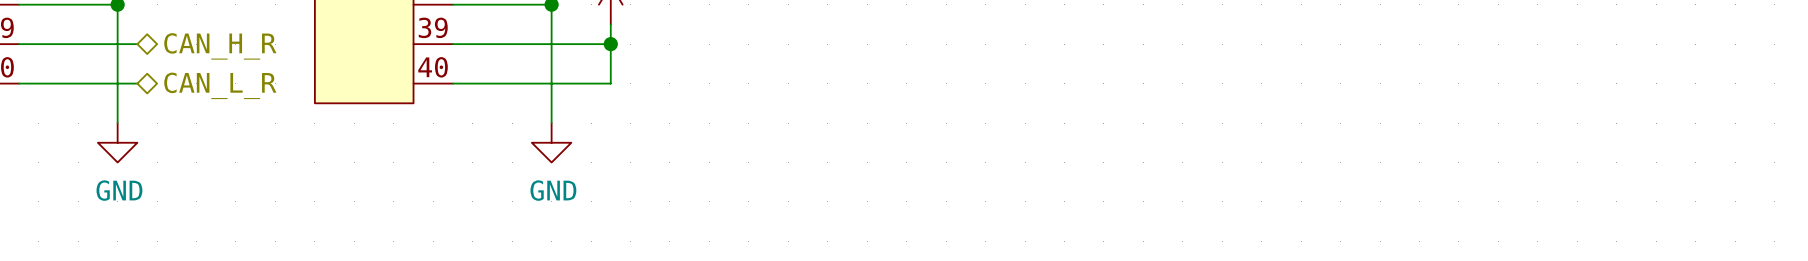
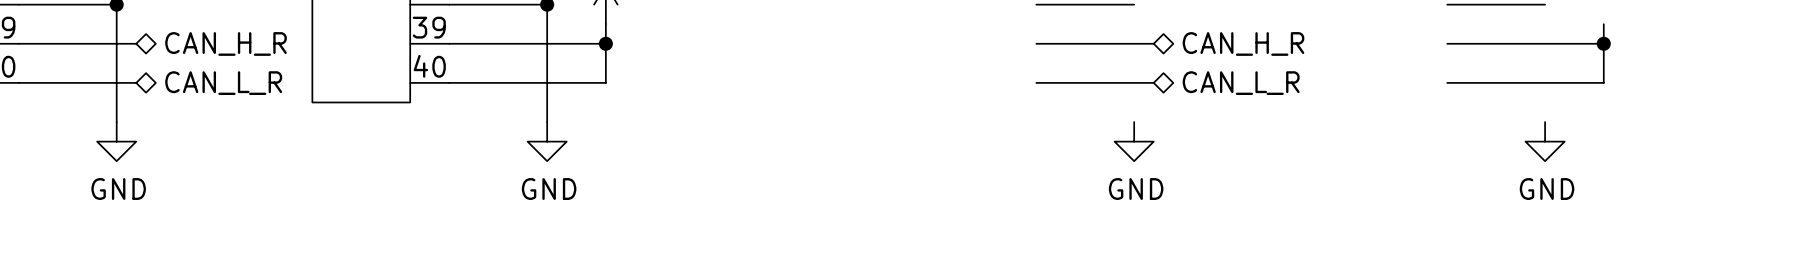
wire: none -> (1036, 4) (1134, 4)
wire: none -> (1447, 4) (1545, 4)
wire: none -> (1603, 24) (1603, 82) (1447, 82)
wire: none -> (1036, 43) (1153, 43)
wire: none -> (1447, 43) (1603, 43)
junction: none -> (1603, 43)
hierarchical label: none -> CAN_H_R (1243, 43)
wire: none -> (1036, 82) (1153, 82)
hierarchical label: none -> CAN_L_R (1241, 83)
power symbol: none -> GND (1134, 141)
power symbol: none -> GND (1545, 141)

